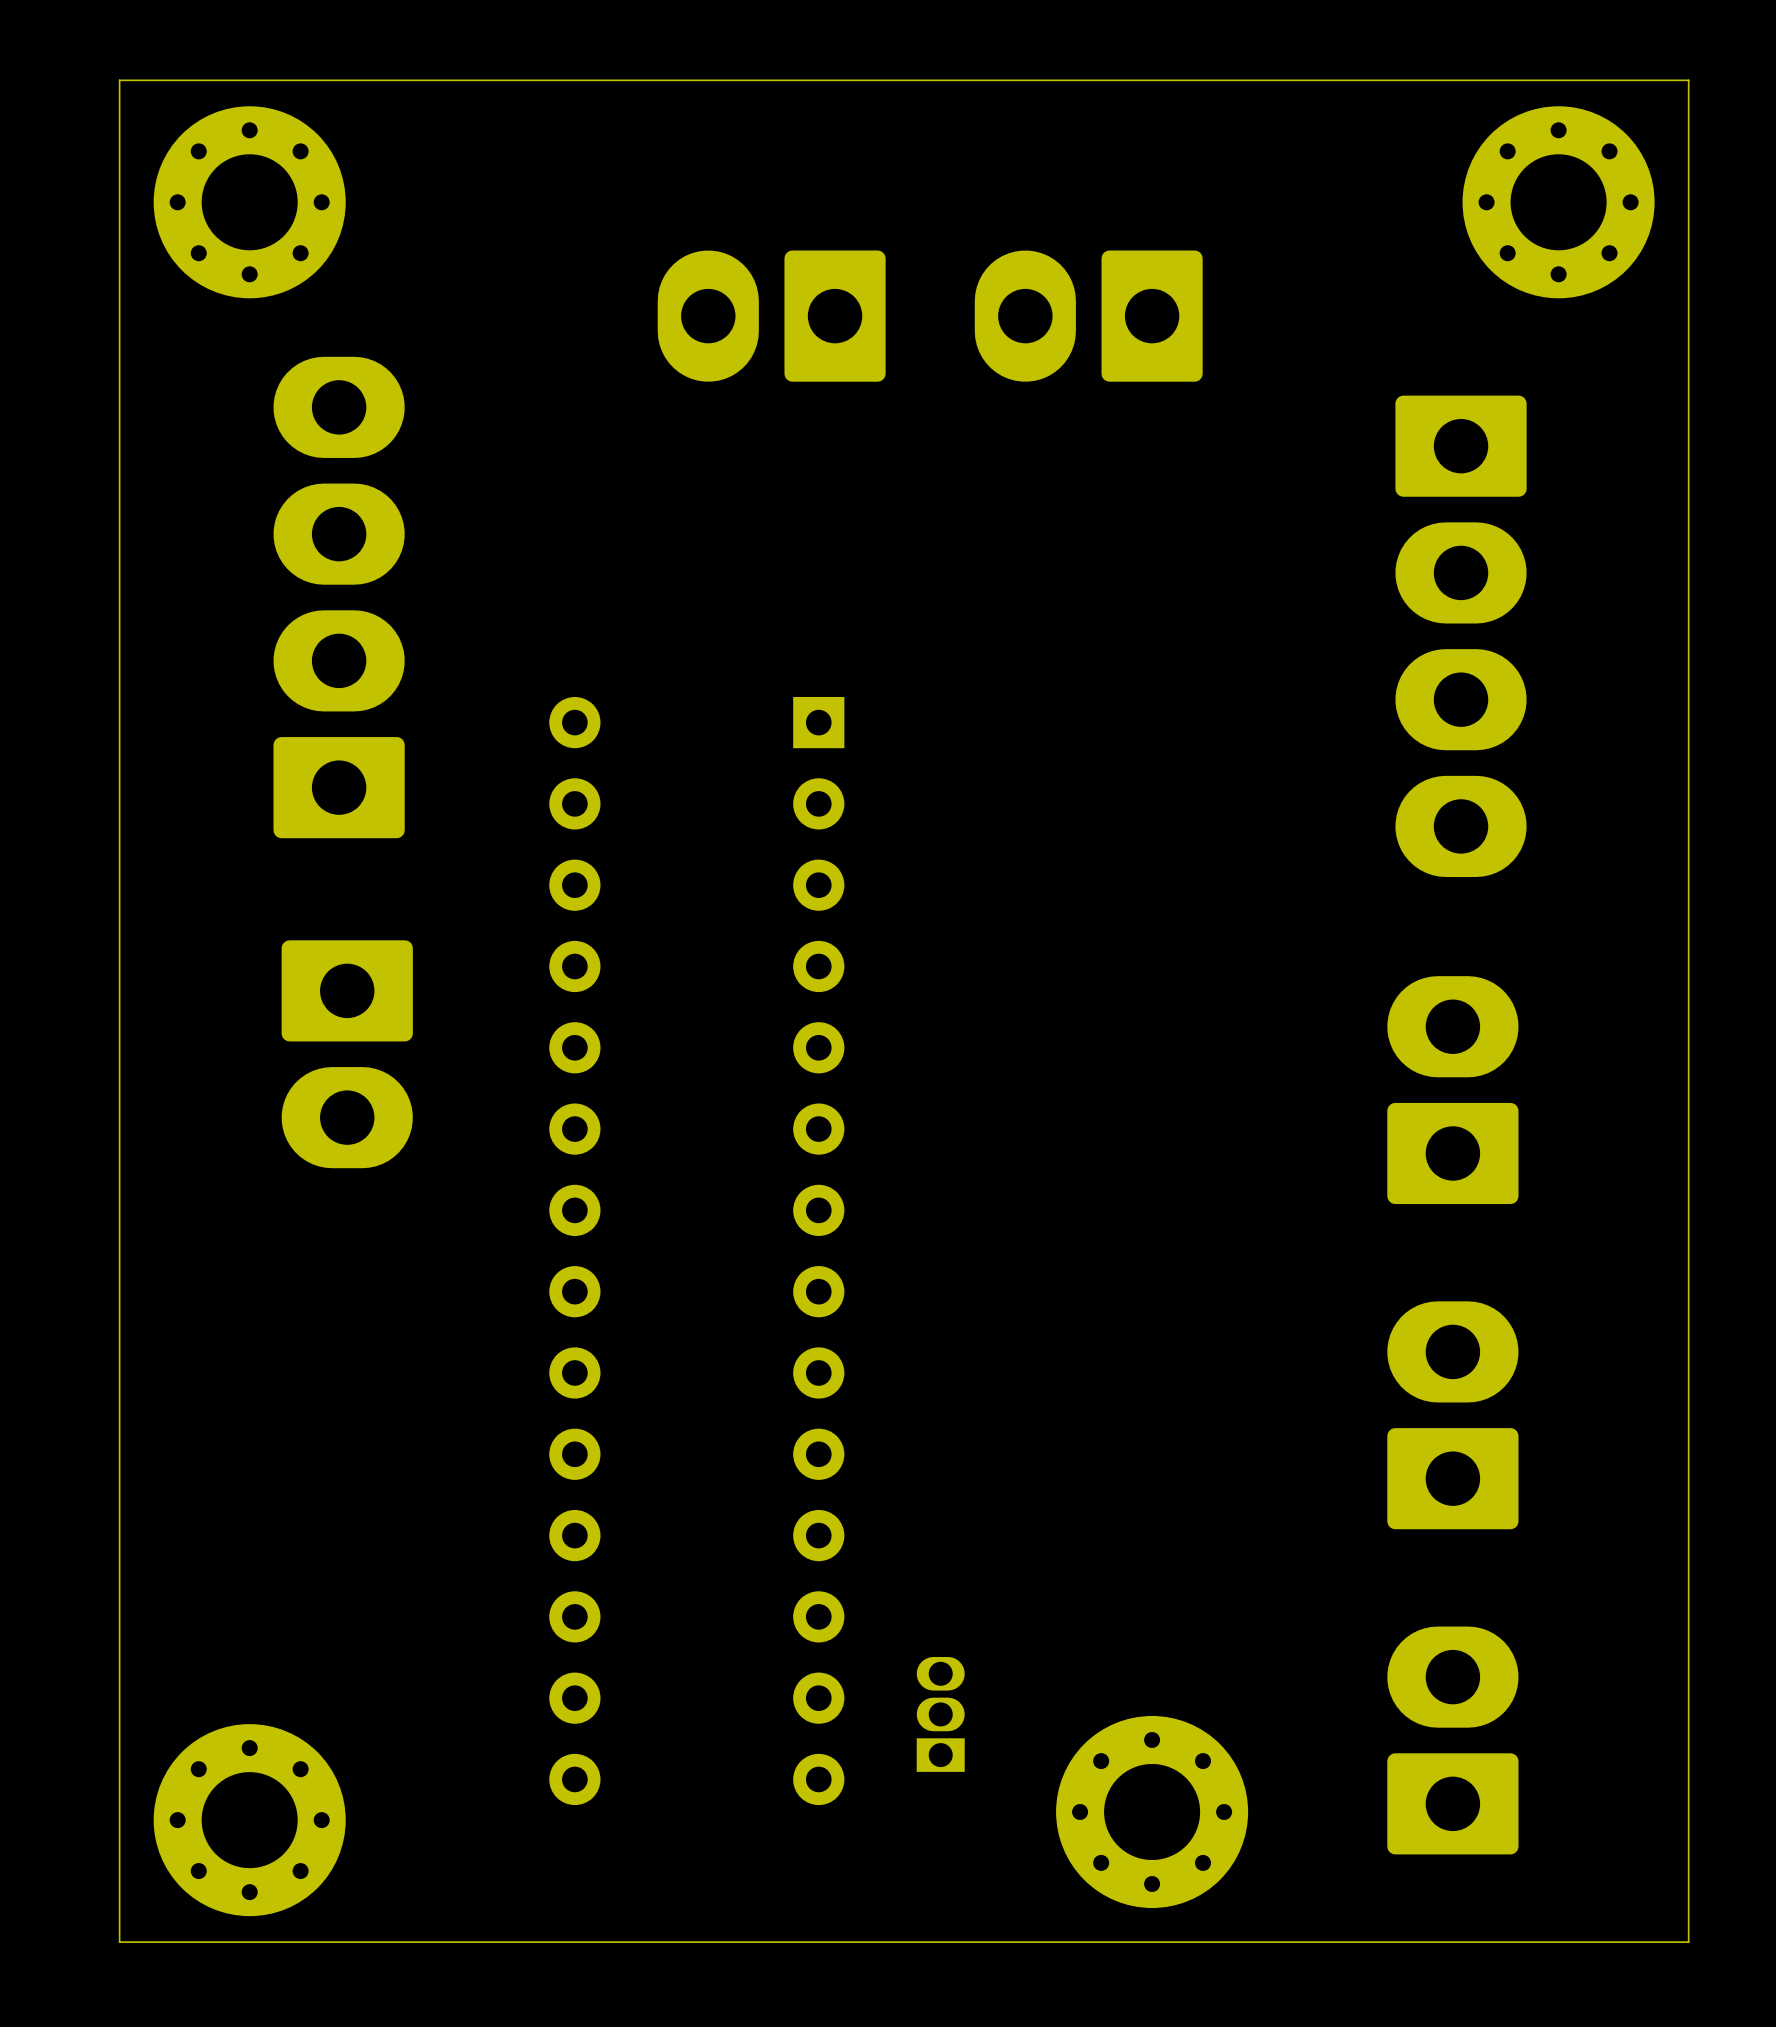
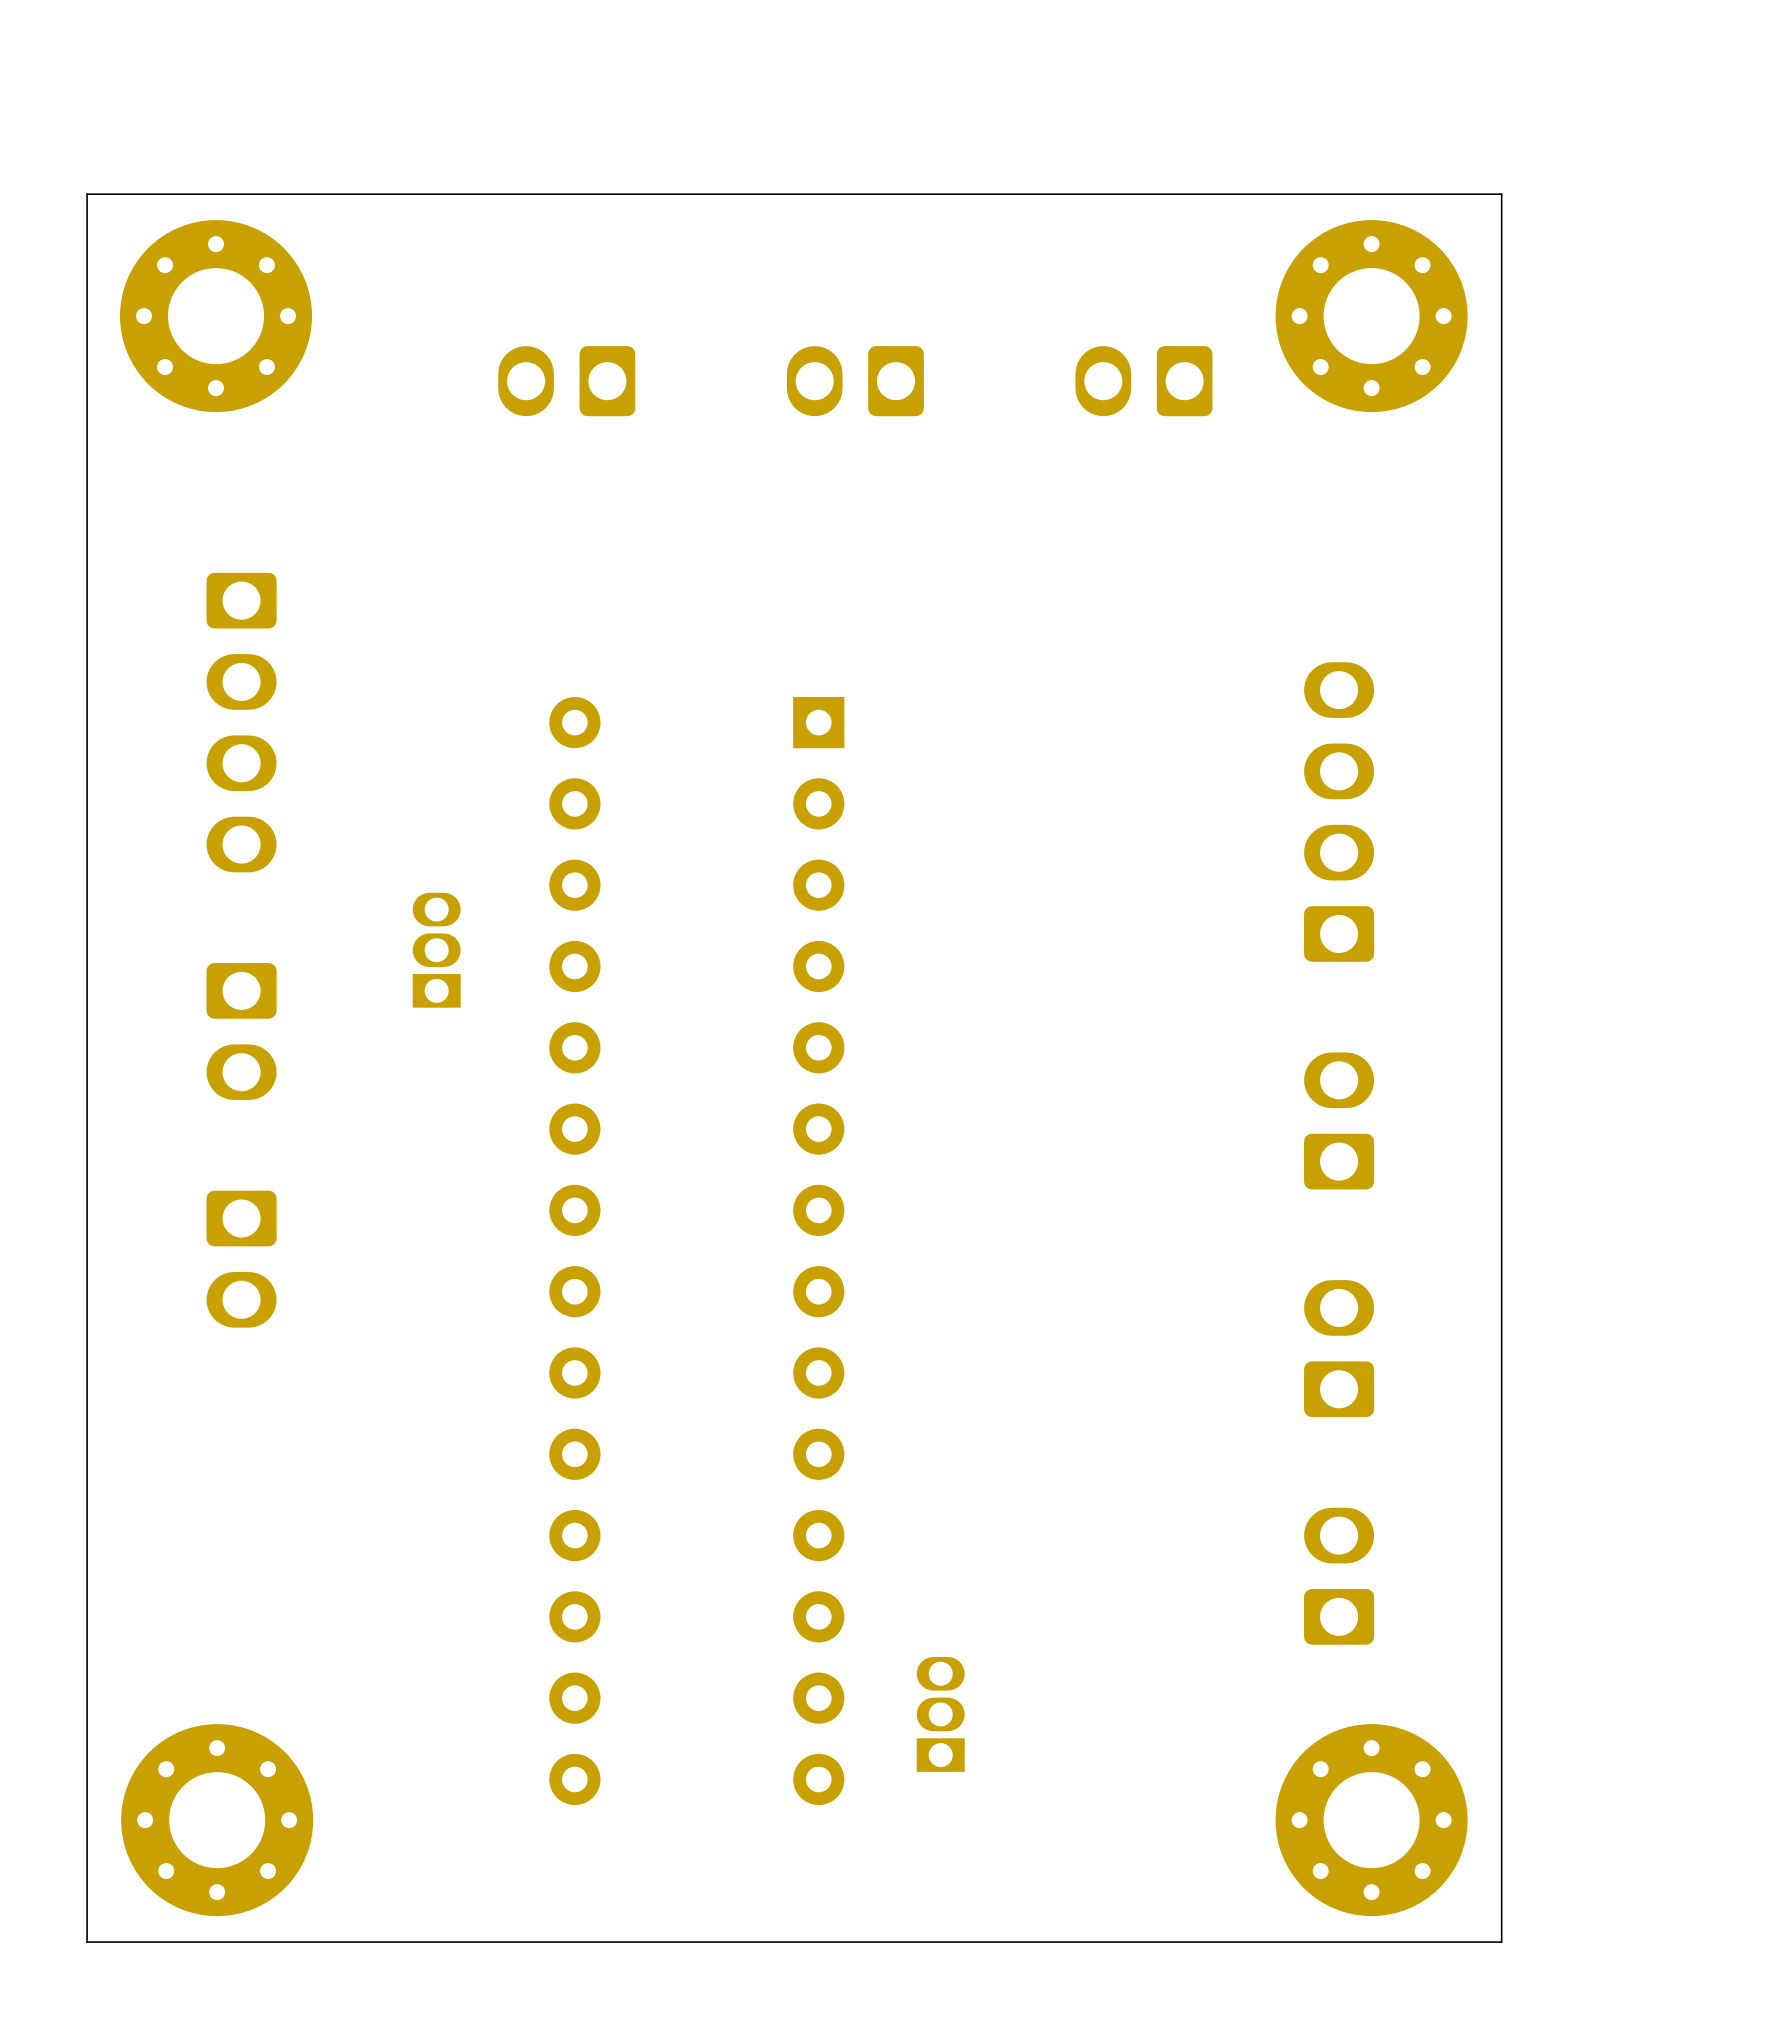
part position: (249, 202) -> (216, 316)
part position: (1558, 202) -> (1371, 316)
part: (771, 316) -> none
part: (1088, 316) -> none
part: none -> (566, 381)
part: none -> (855, 381)
part: none -> (1143, 381)
part: (339, 597) -> none
part: (1461, 636) -> none
part: none -> (241, 722)
part: none -> (1339, 812)
part: none -> (436, 950)
part: none -> (241, 1031)
part: (347, 1054) -> none
part: (1452, 1090) -> none
part: none -> (1339, 1120)
part: none -> (241, 1259)
part: none -> (1339, 1348)
part: (1452, 1415) -> none
part: none -> (1339, 1576)
part: (1452, 1740) -> none
part position: (1152, 1811) -> (1371, 1820)
part position: (249, 1820) -> (217, 1820)
board edge: (1501, 1942) (1688, 1942) (1688, 80) (119, 80) (119, 1942) -> (1501, 1942) (1501, 194) (87, 194) (87, 1942) (119, 1942)

